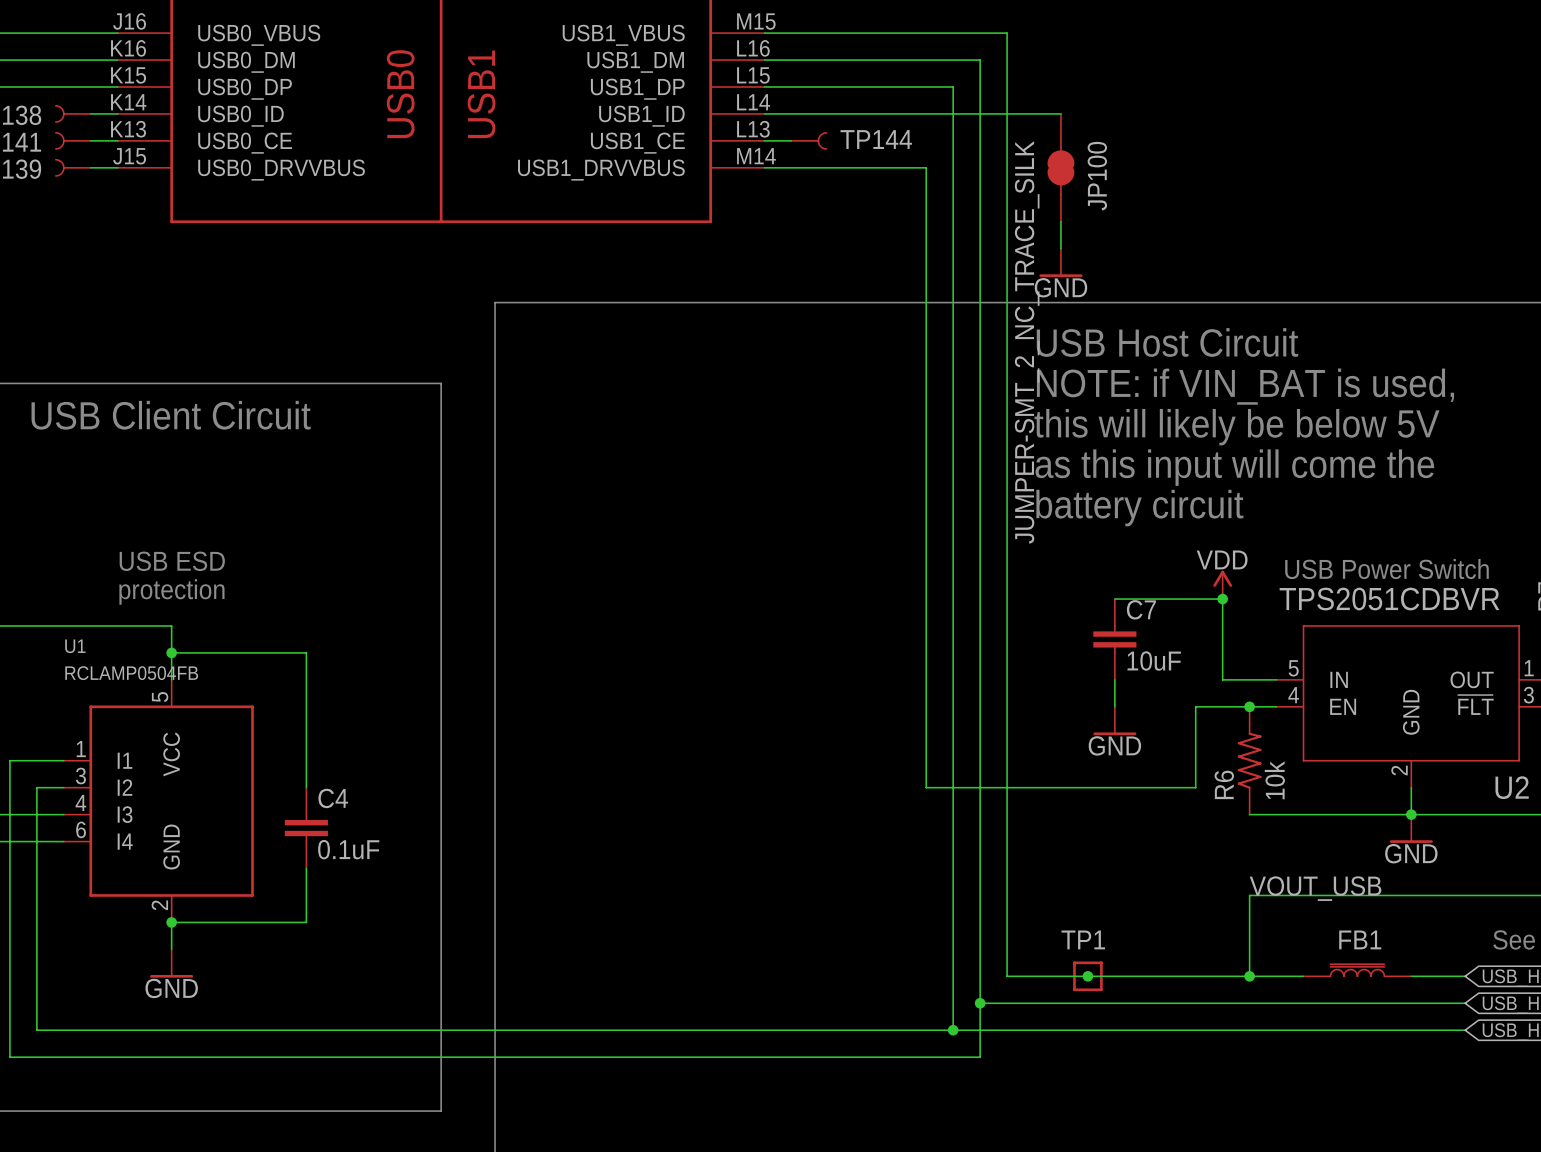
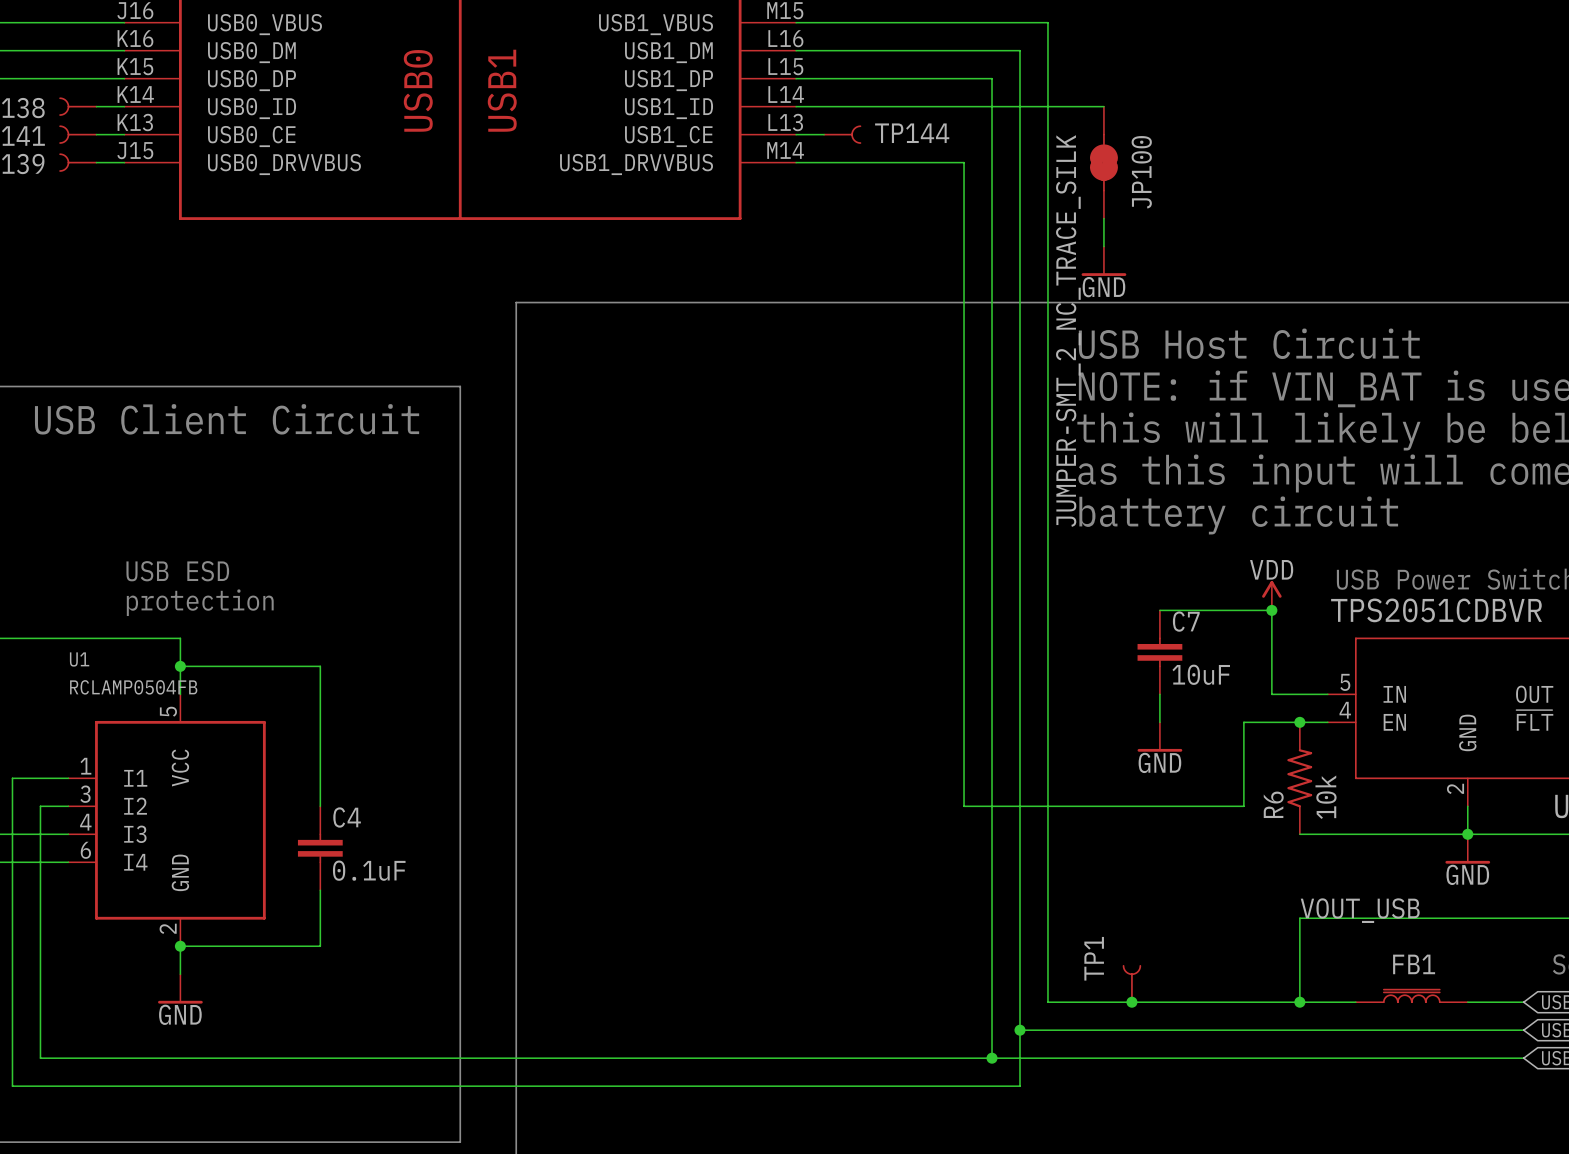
TP1 name position: TP1 (1083, 939) -> TP1 (1094, 958)
TP1 symbol: [1073, 961, 1103, 992] -> [1122, 964, 1142, 1004]

